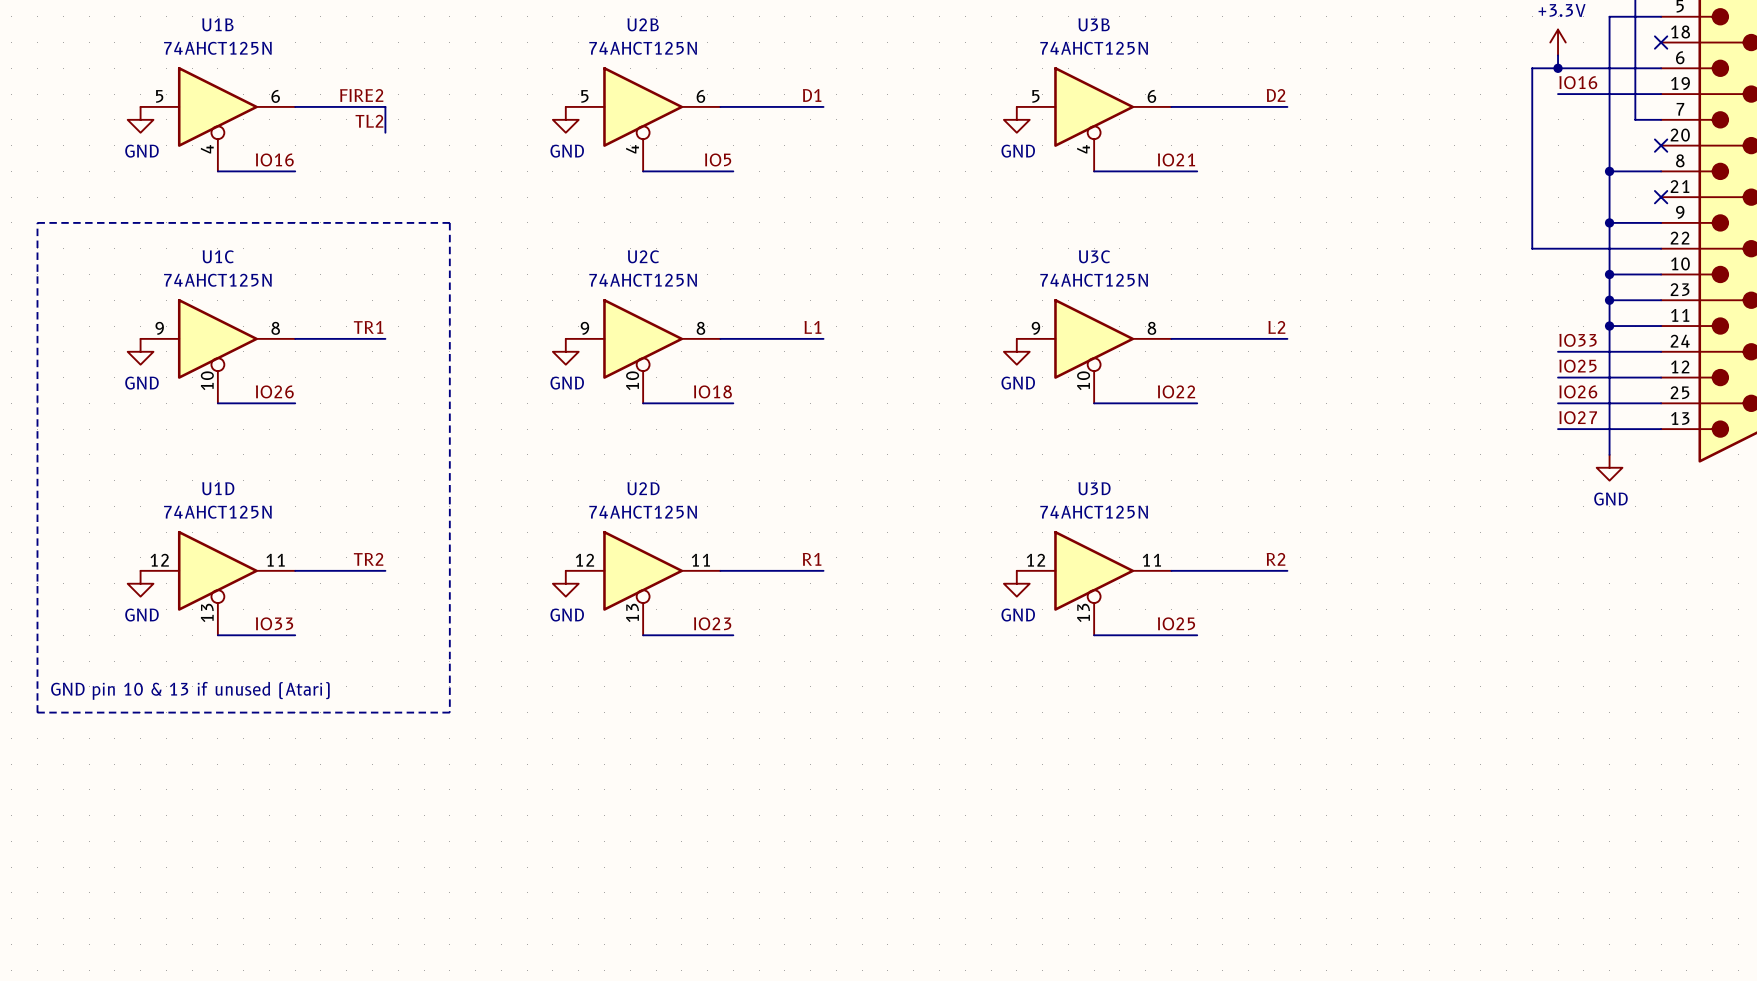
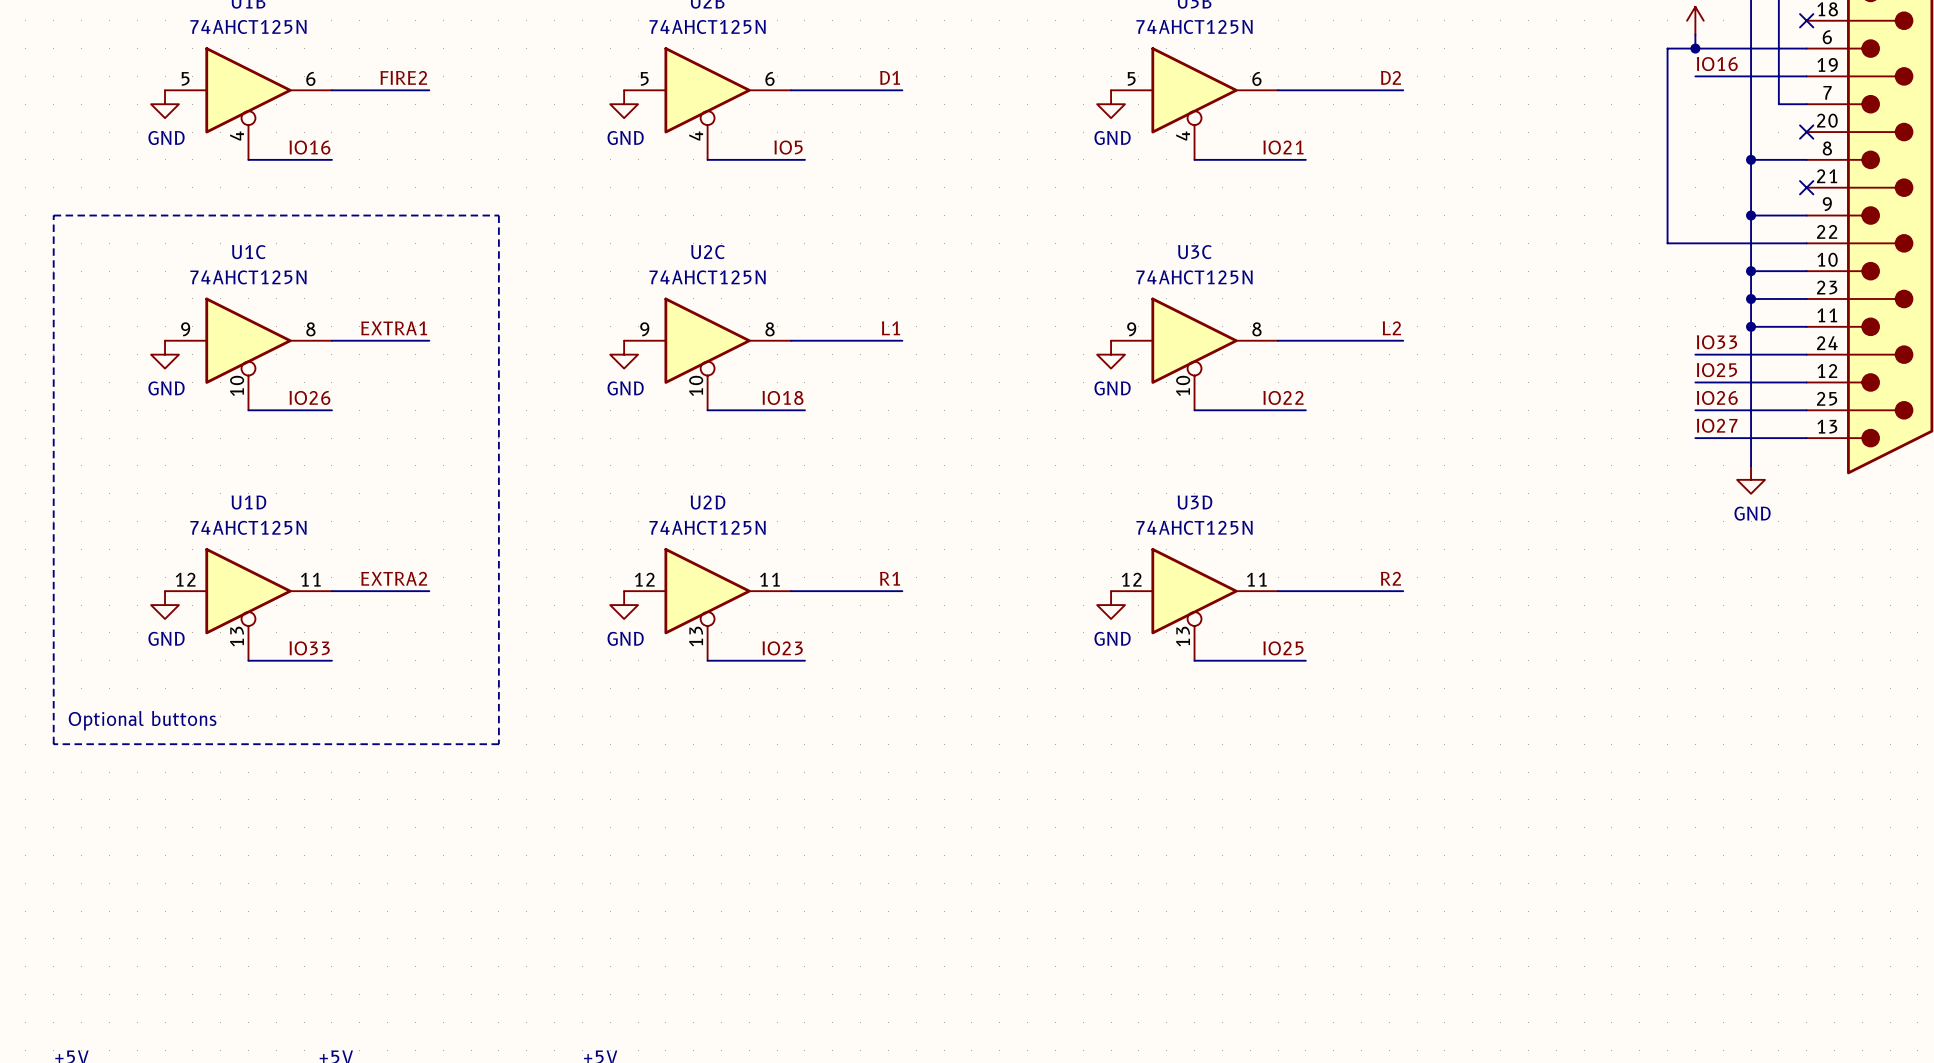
wire: (385, 106) (385, 132) -> none
label: TL2 (369, 121) -> none
label: TR1 (368, 327) -> EXTRA1 (394, 328)
label: TR2 (368, 559) -> EXTRA2 (394, 578)
text: GND pin 10 & 13 if unused (Atari) (190, 690) -> Optional buttons (142, 720)

